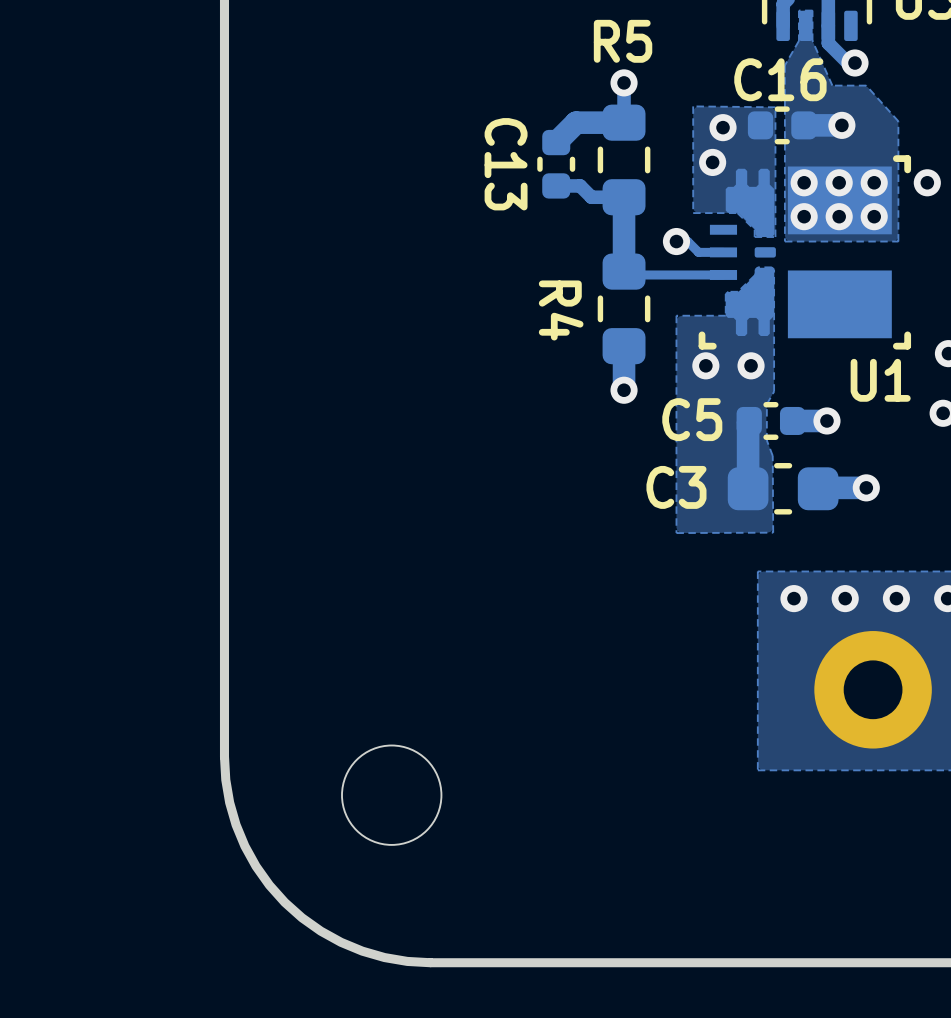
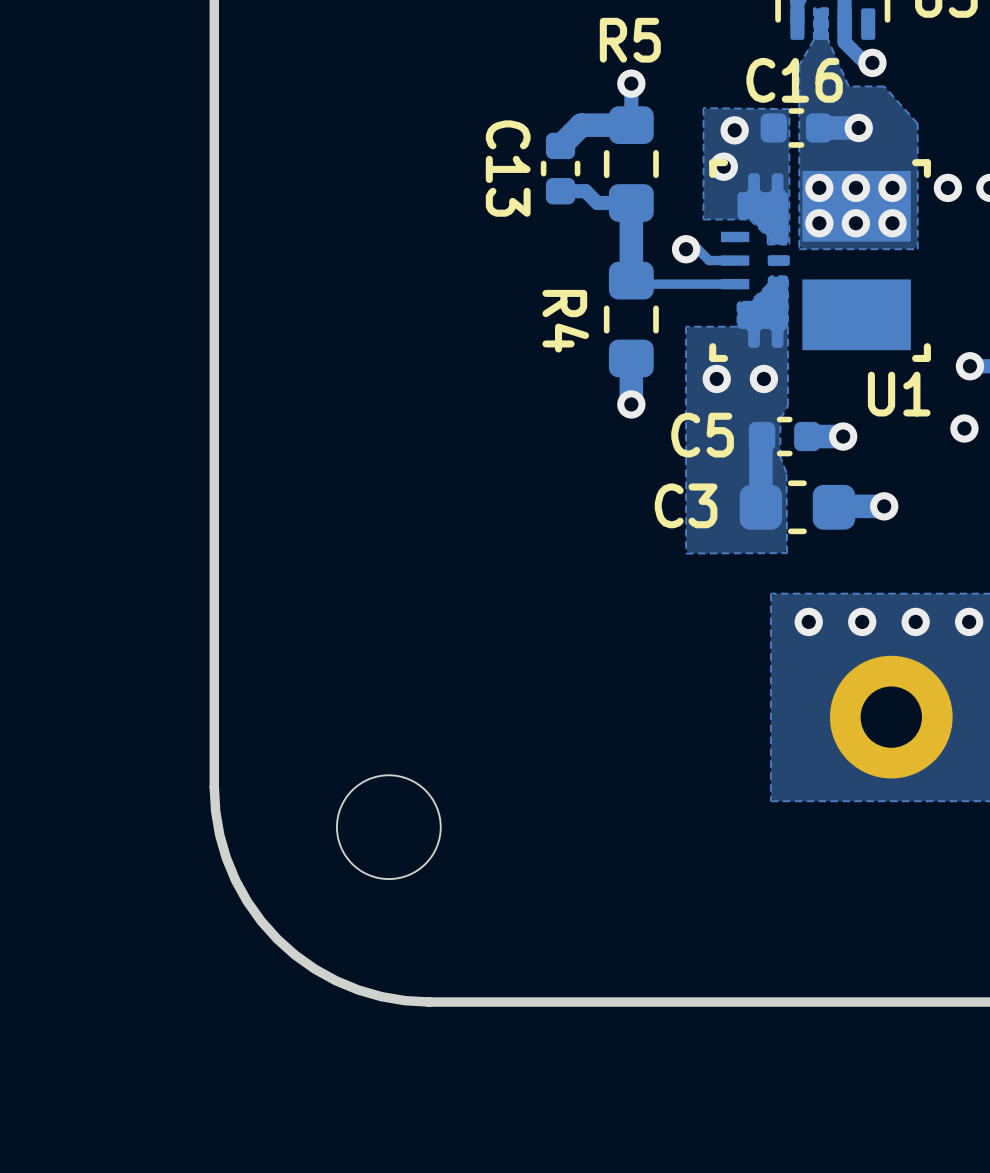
U1 footprint: [698, 155, 912, 350] -> [709, 159, 931, 362]

